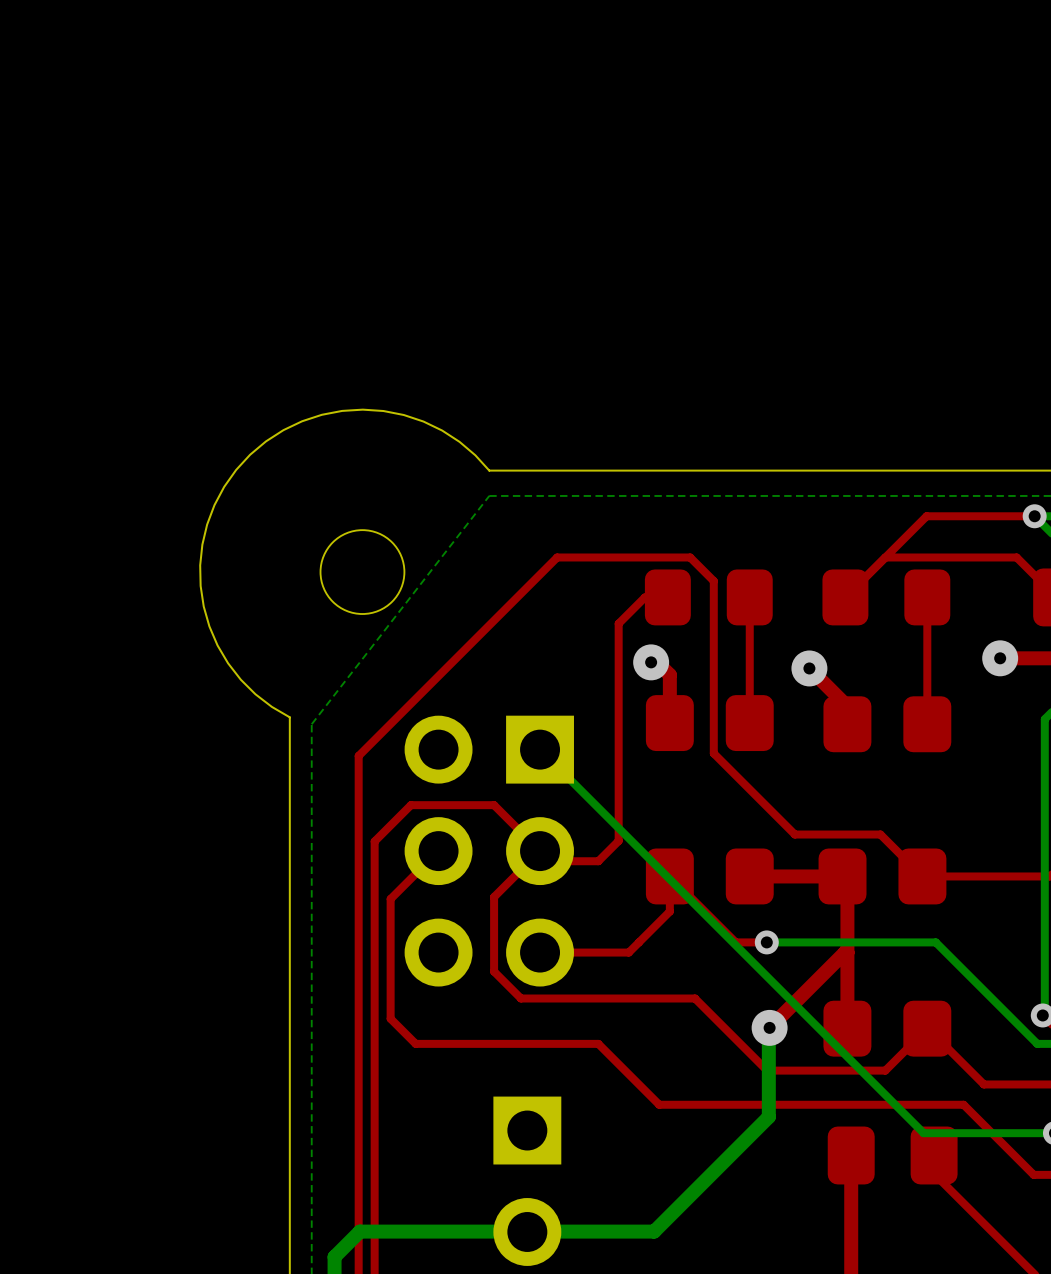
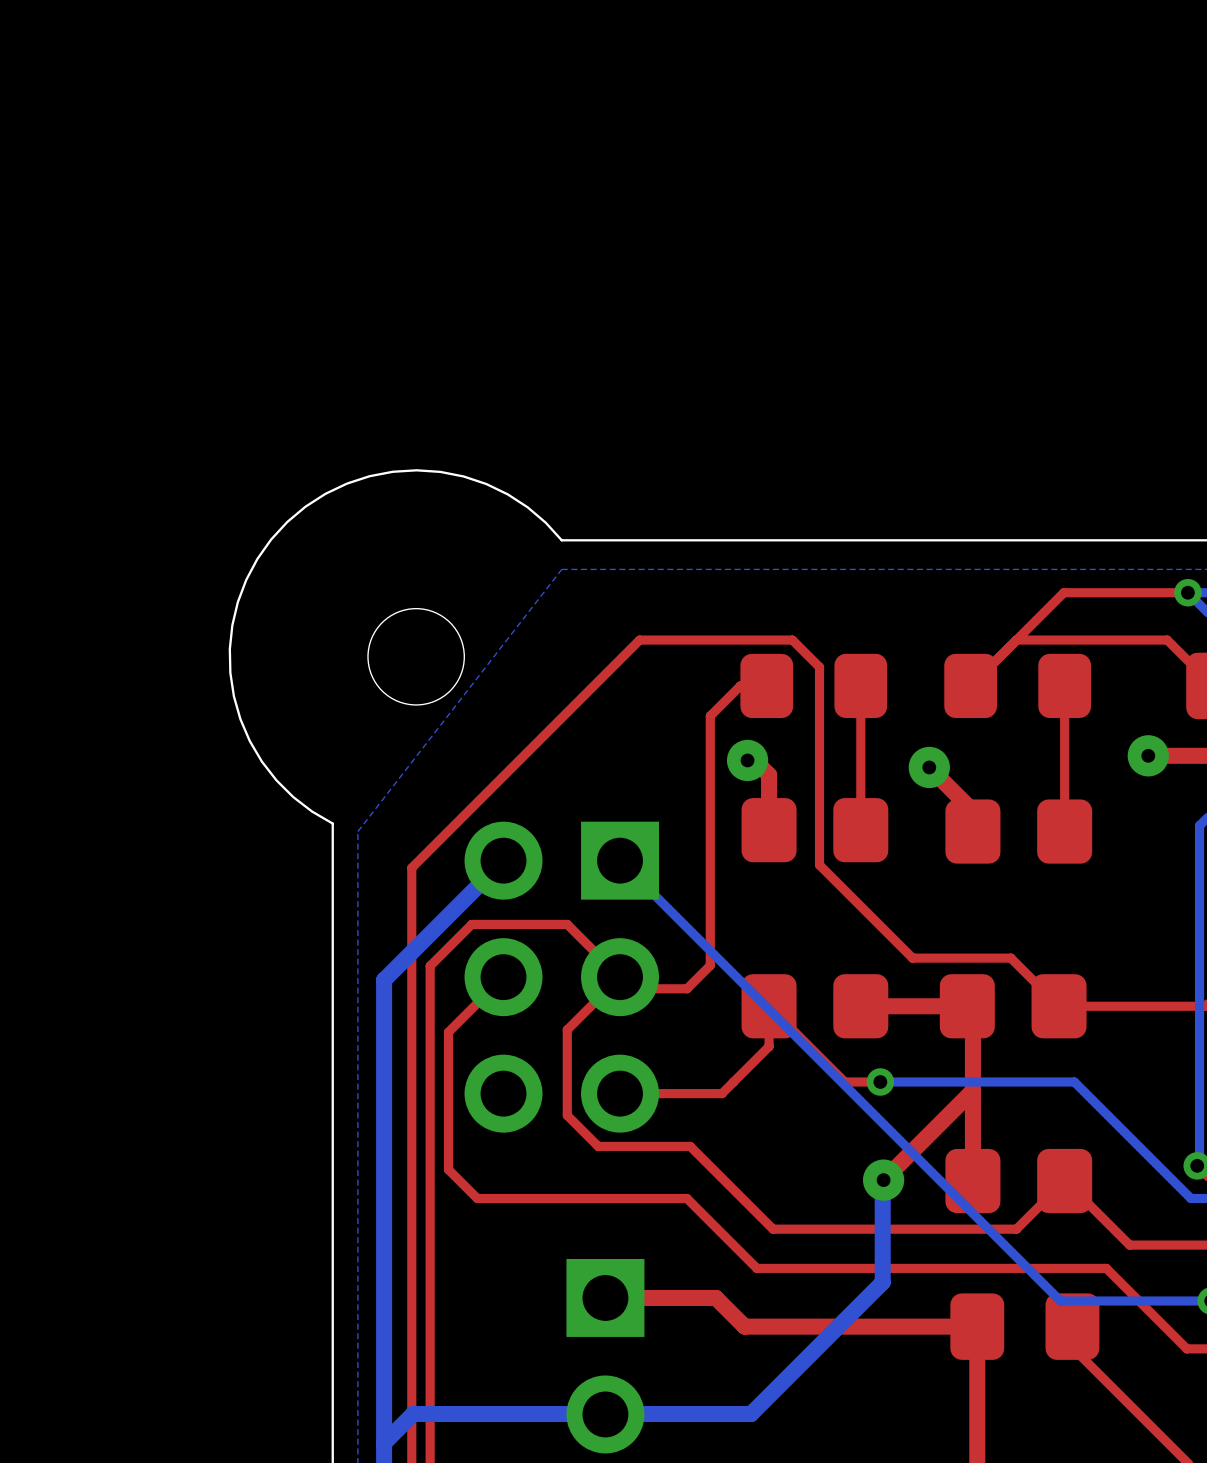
bottom track: none -> (503, 860) (384, 980) (384, 1443)
top track: (601, 998) (695, 998) (767, 1070) -> (690, 1146) (773, 1229) (880, 1229)
top track: none -> (605, 1297) (716, 1297) (744, 1326) (977, 1326)

